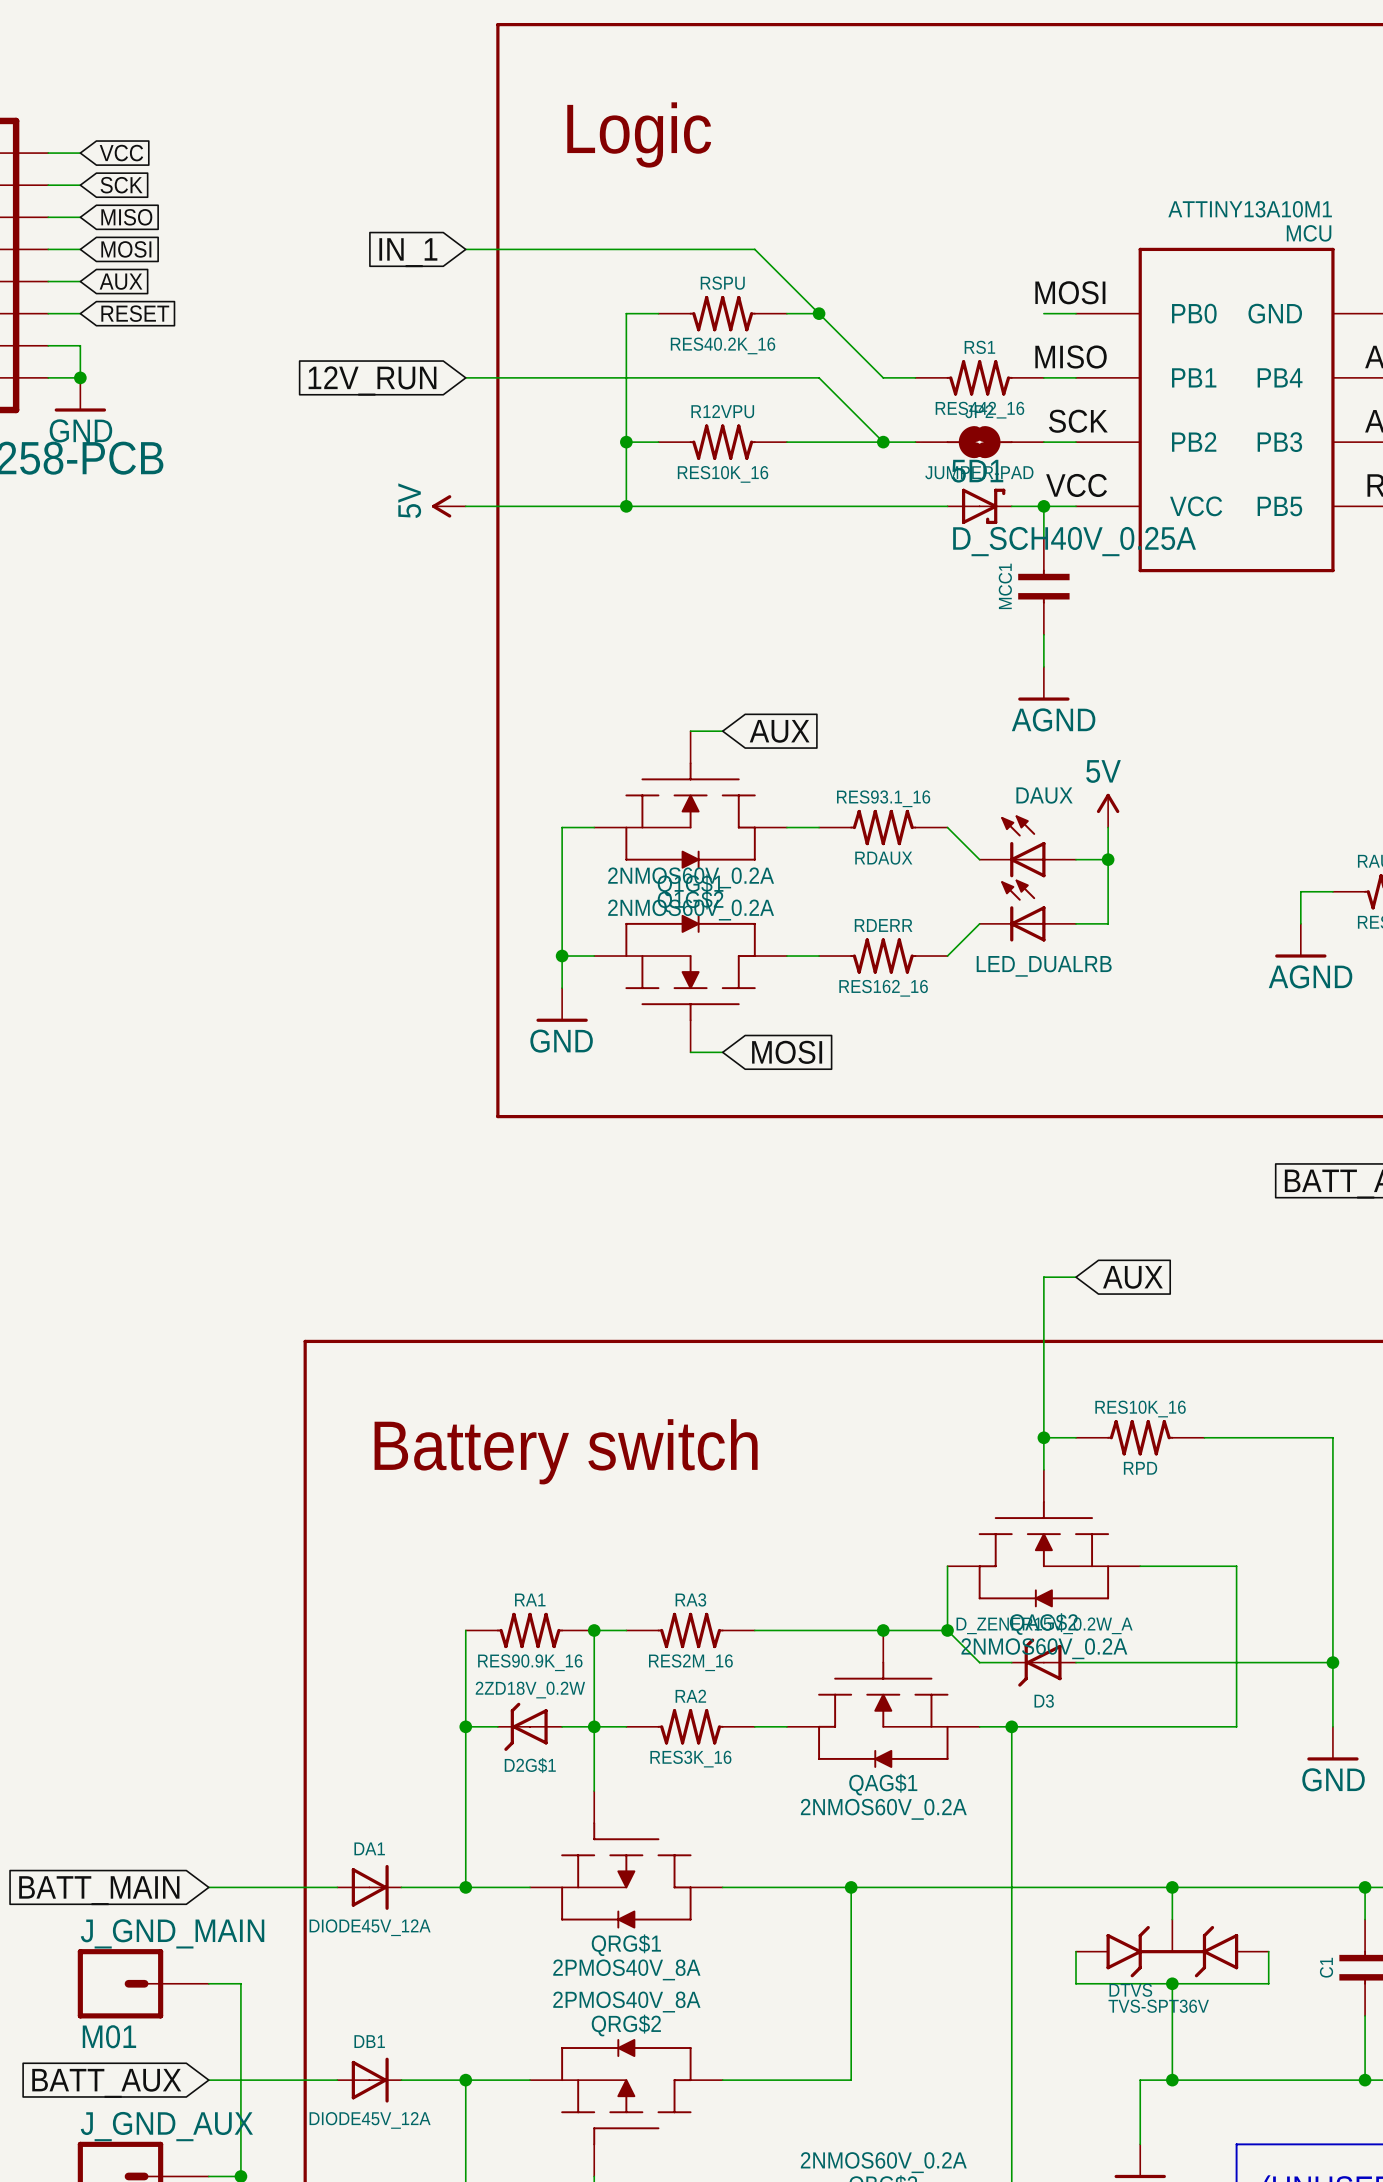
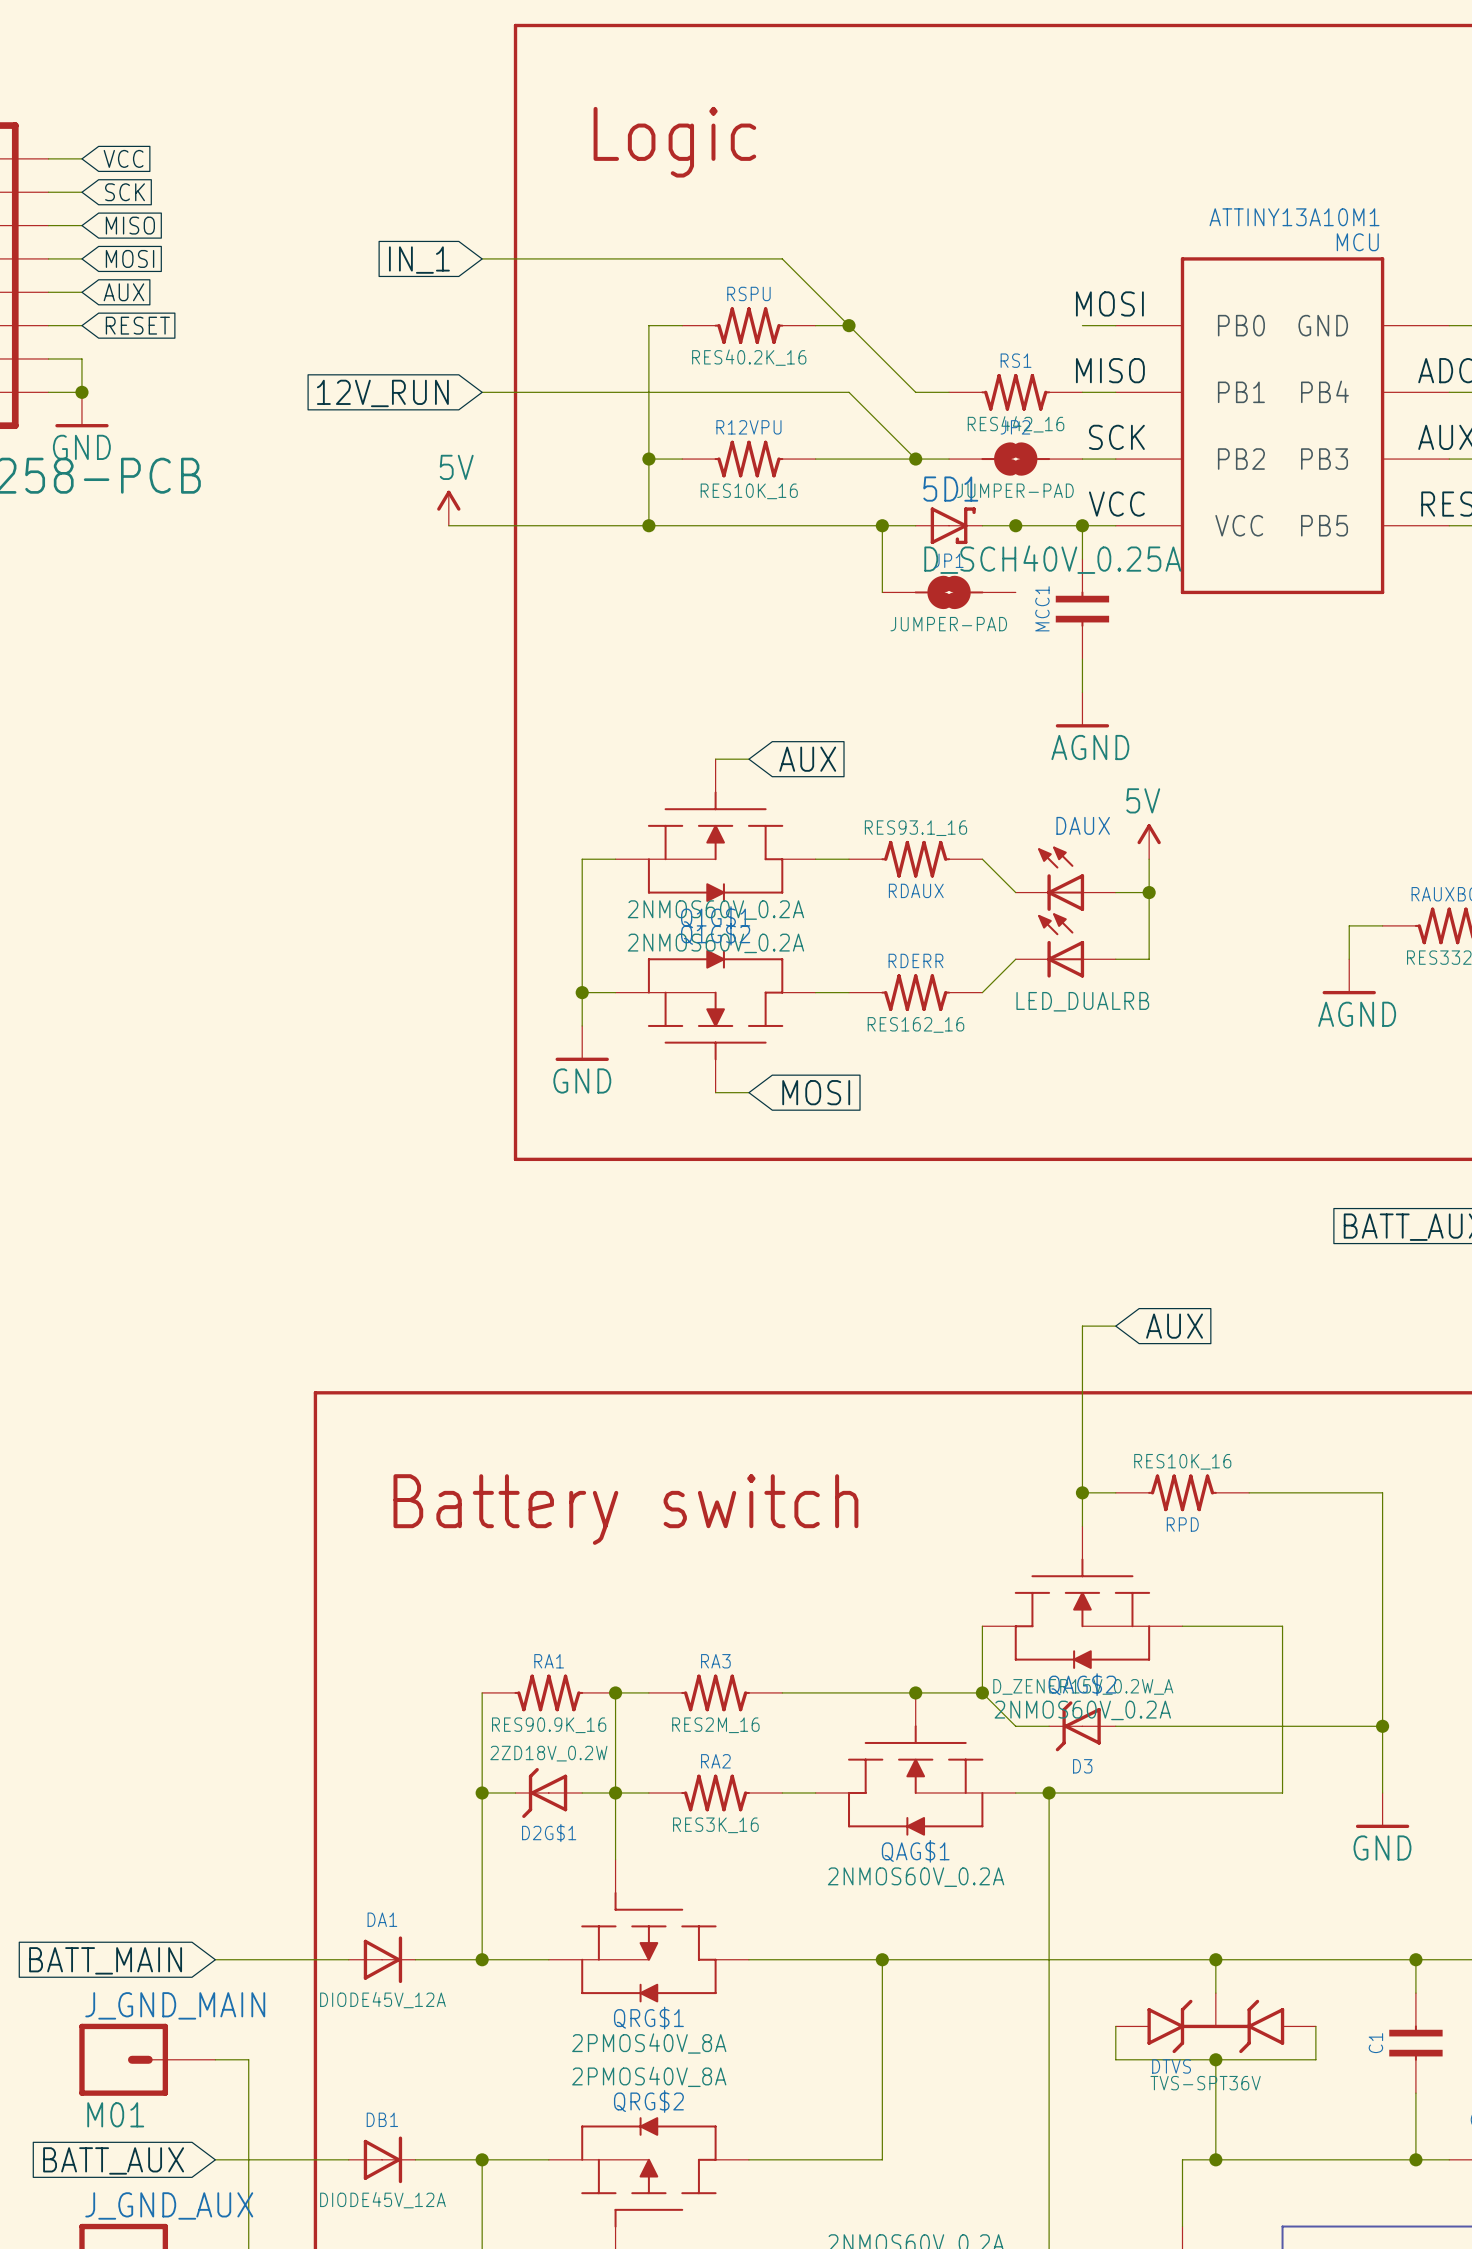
power symbol rotation: 0° (441, 506) -> 90° clockwise (448, 500)
power symbol position: 5V (448, 506) -> 5V (448, 508)
wire: none -> (882, 525) (882, 592)
junction: none -> (882, 525)
5D1 position: (979, 506) -> (949, 525)
junction: none -> (1015, 525)
JP1: none -> JUMPER-PAD (949, 592)

